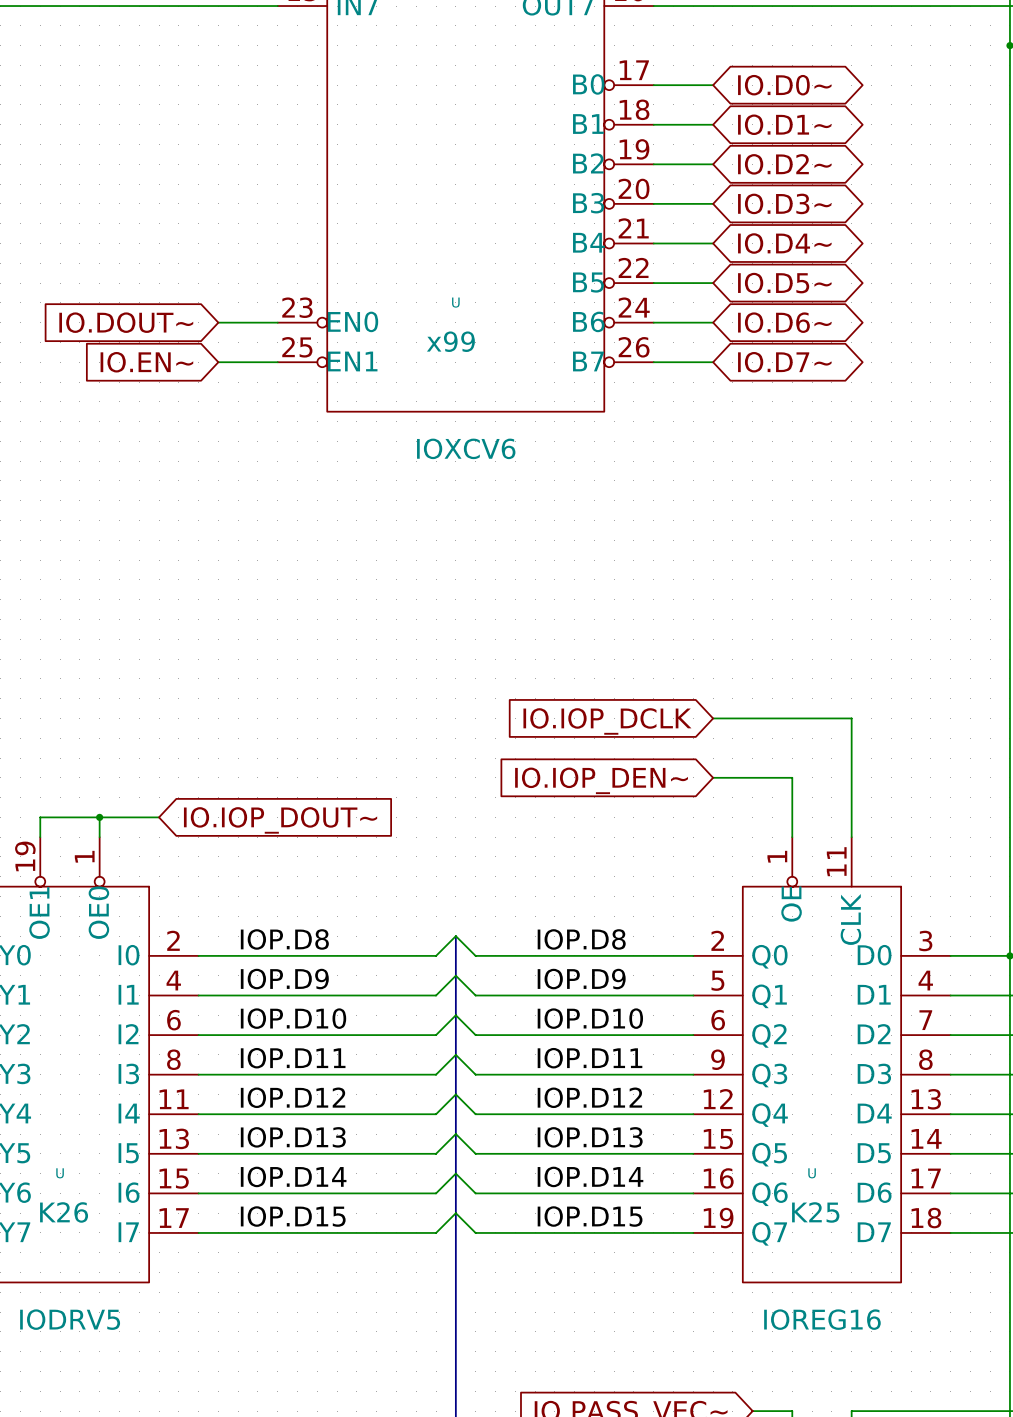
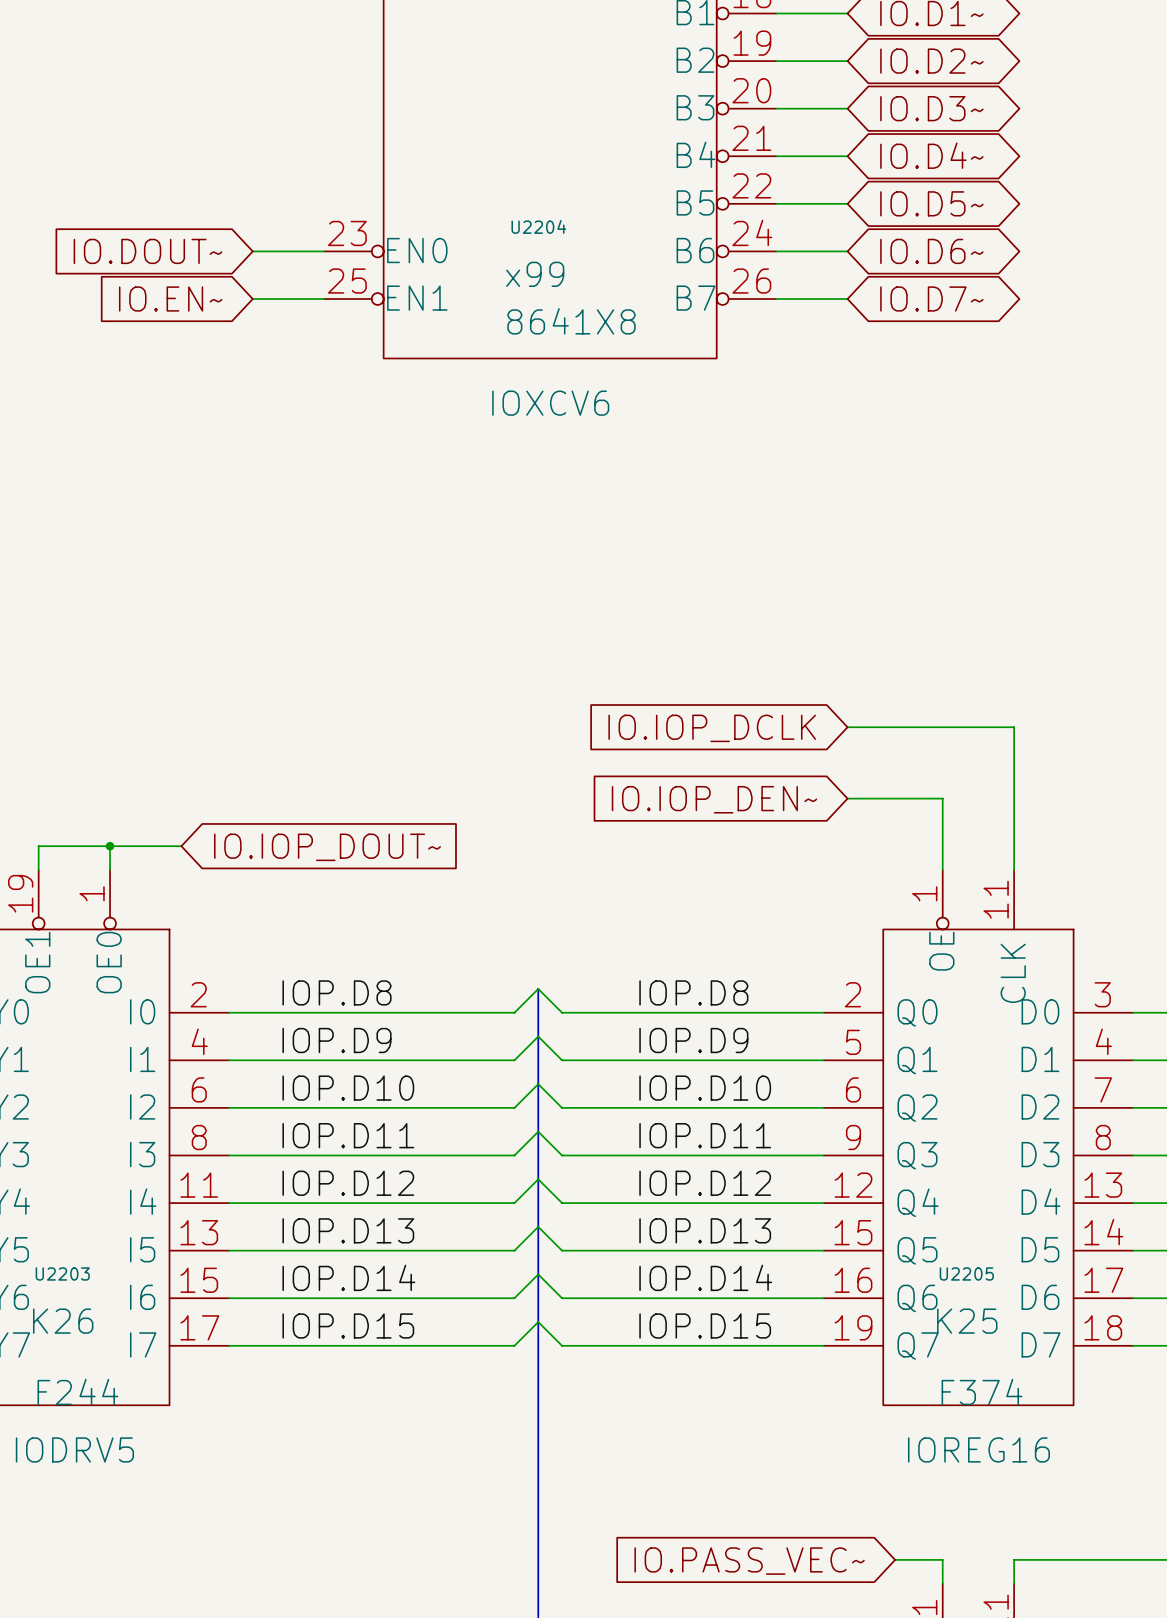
U name: U (455, 302) -> U2204 (538, 226)
U value: none -> 8641X8 (571, 321)
U name: U (60, 1173) -> U2203 (62, 1273)
U name: U (812, 1173) -> U2205 (966, 1273)
U value: none -> F244 (77, 1391)
U value: none -> F374 (982, 1391)

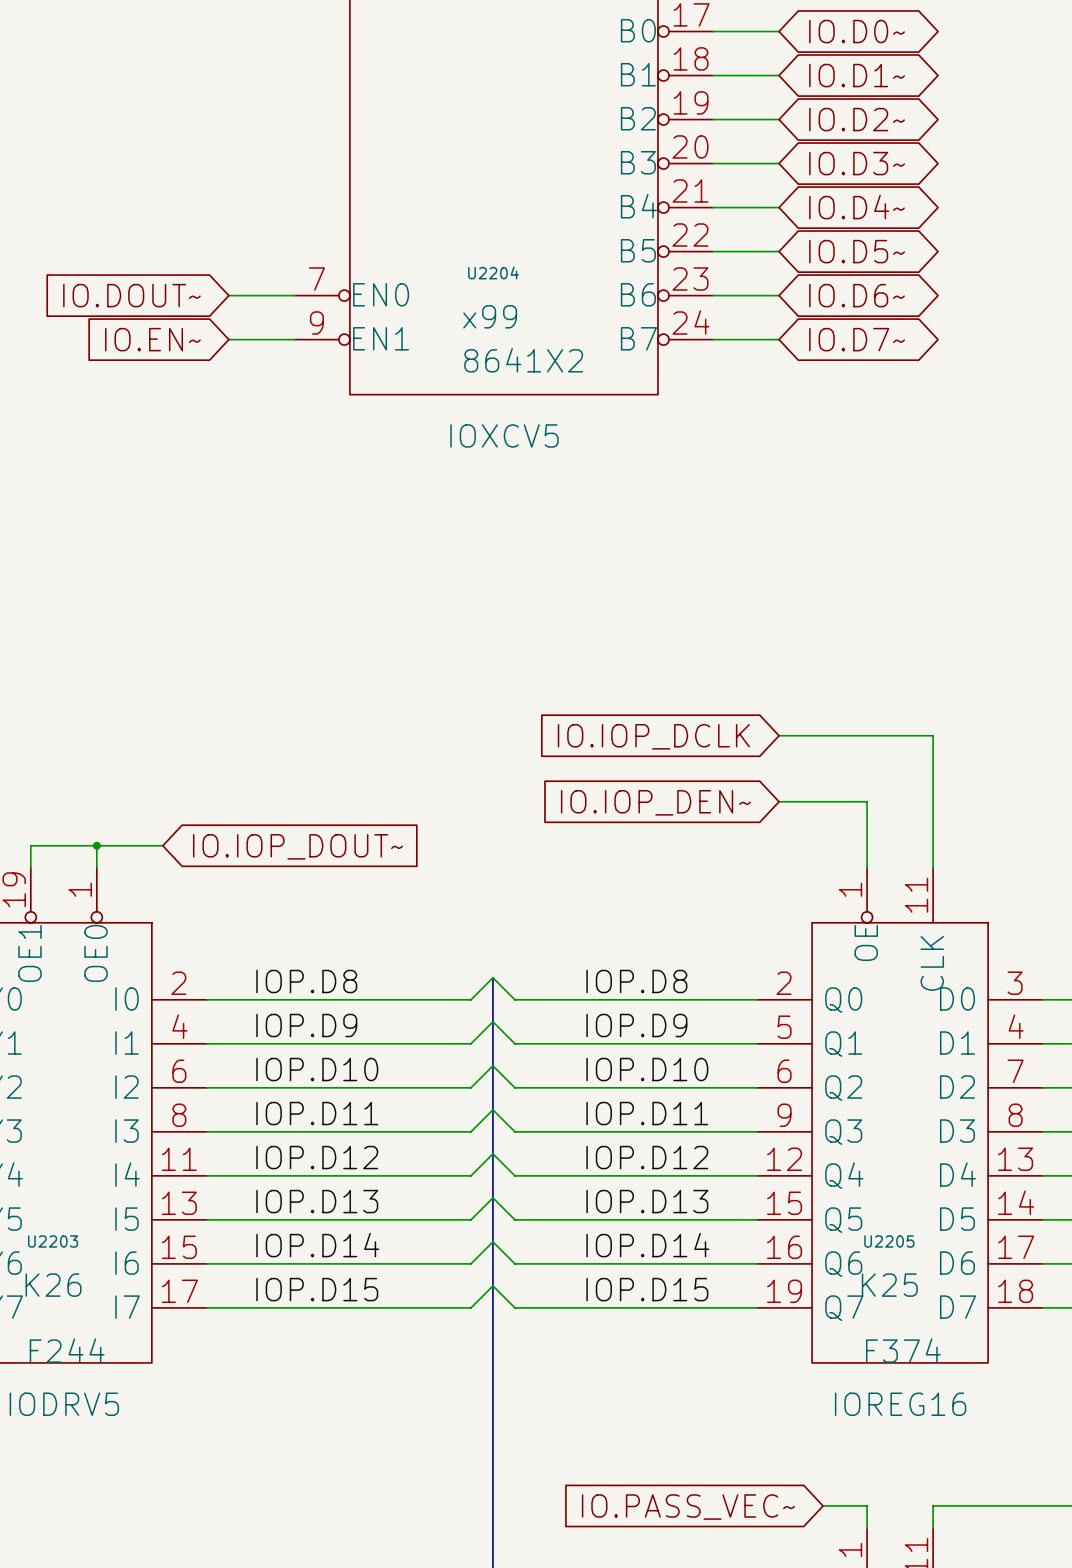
U2204 pin number: 24 (752, 232) -> 23 (690, 279)
U2204 pin number: 23 (347, 233) -> 7 (316, 279)
U2204 pin number: 25 (347, 281) -> 9 (316, 323)
U2204 pin number: 26 (751, 281) -> 24 (691, 322)
U2204 value: 8641X8 (571, 321) -> 8641X2 (523, 360)
U2204 text: IOXCV6 (550, 403) -> IOXCV5 (504, 435)

